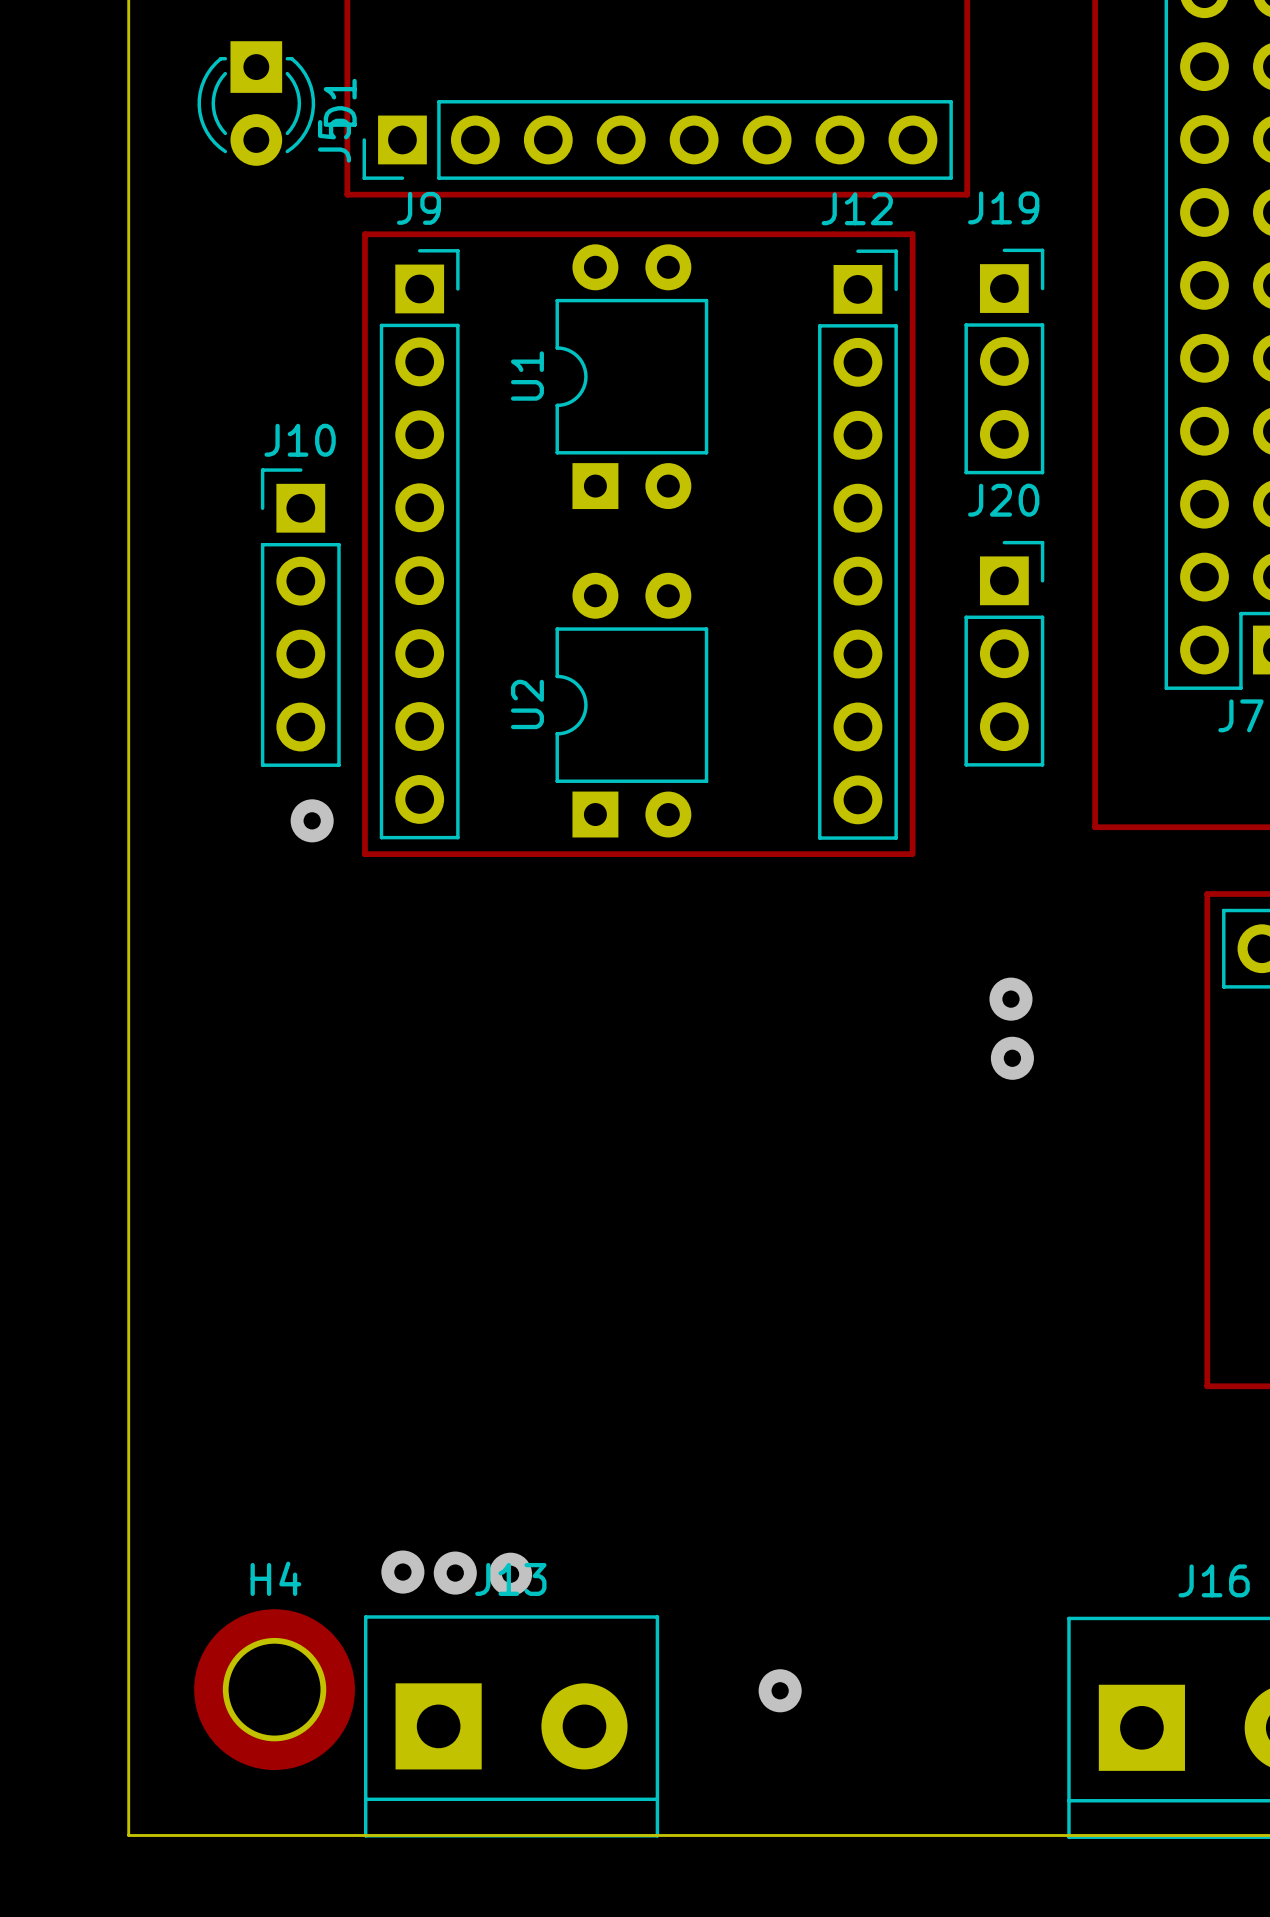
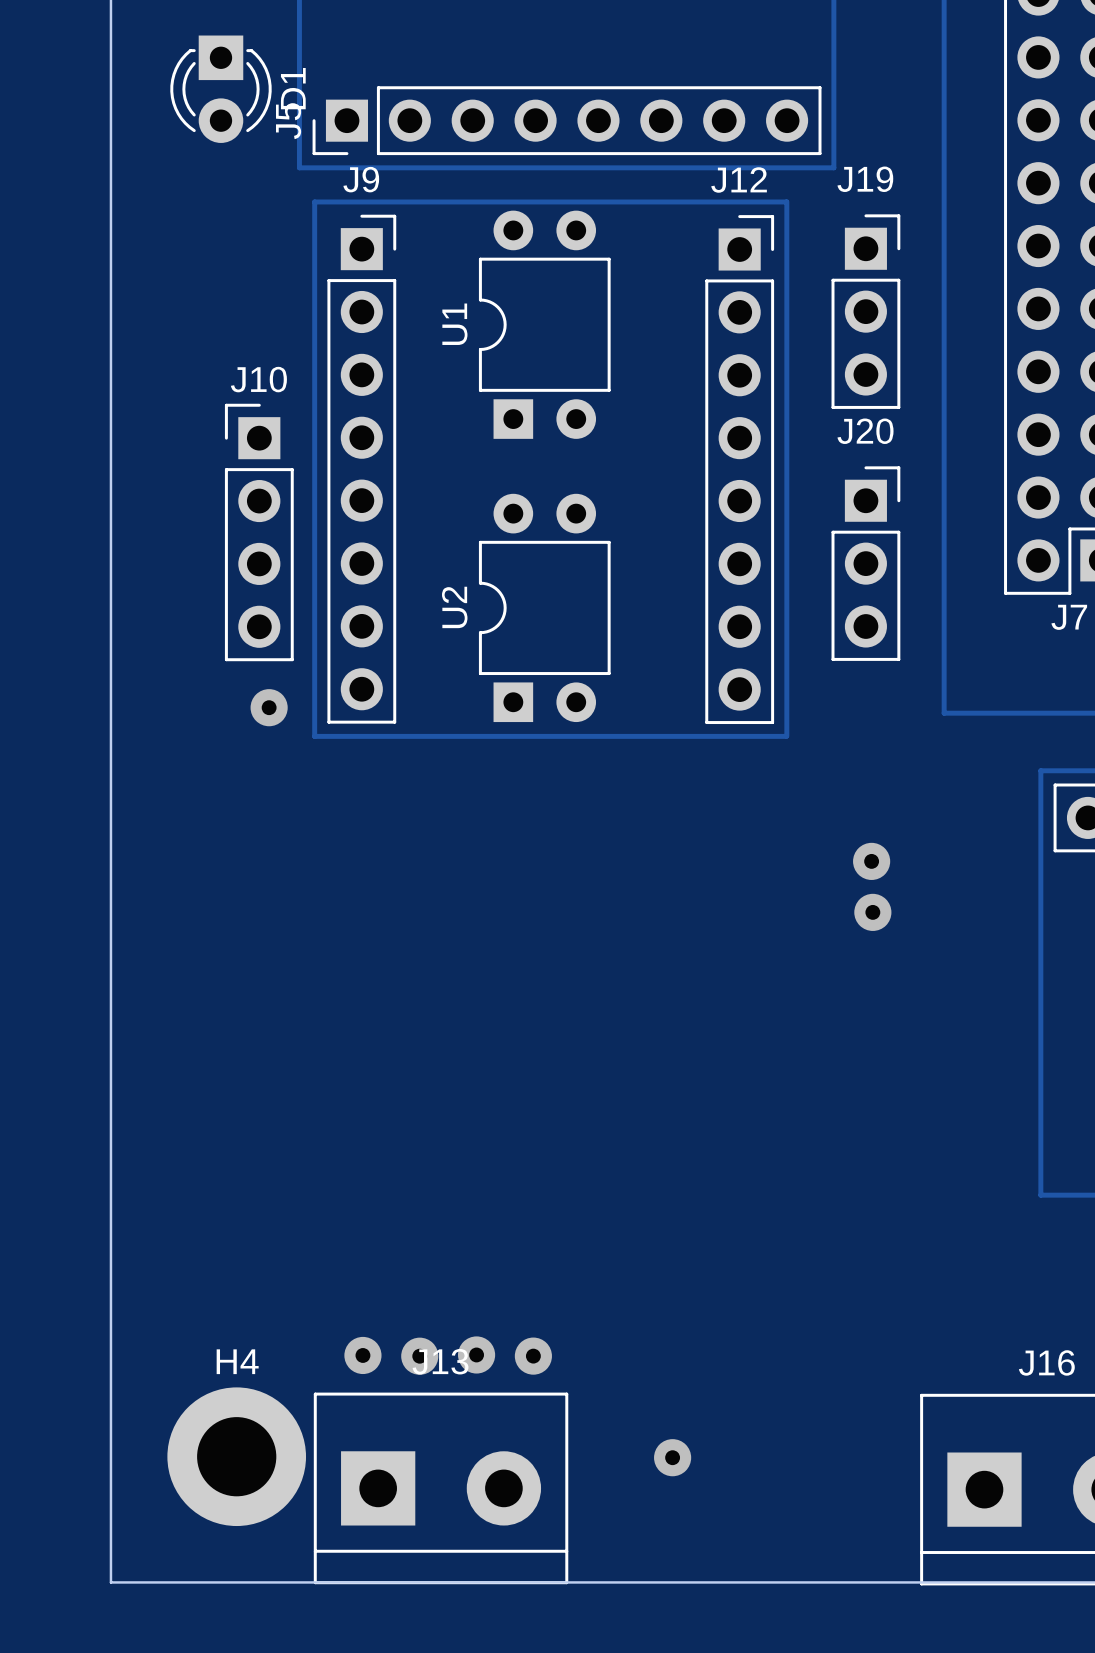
via: none -> (476, 1354)
via: (402, 1572) -> none
via: none -> (362, 1355)
via: none -> (533, 1356)
via: (455, 1573) -> none
via: none -> (419, 1356)
via: (510, 1574) -> none

